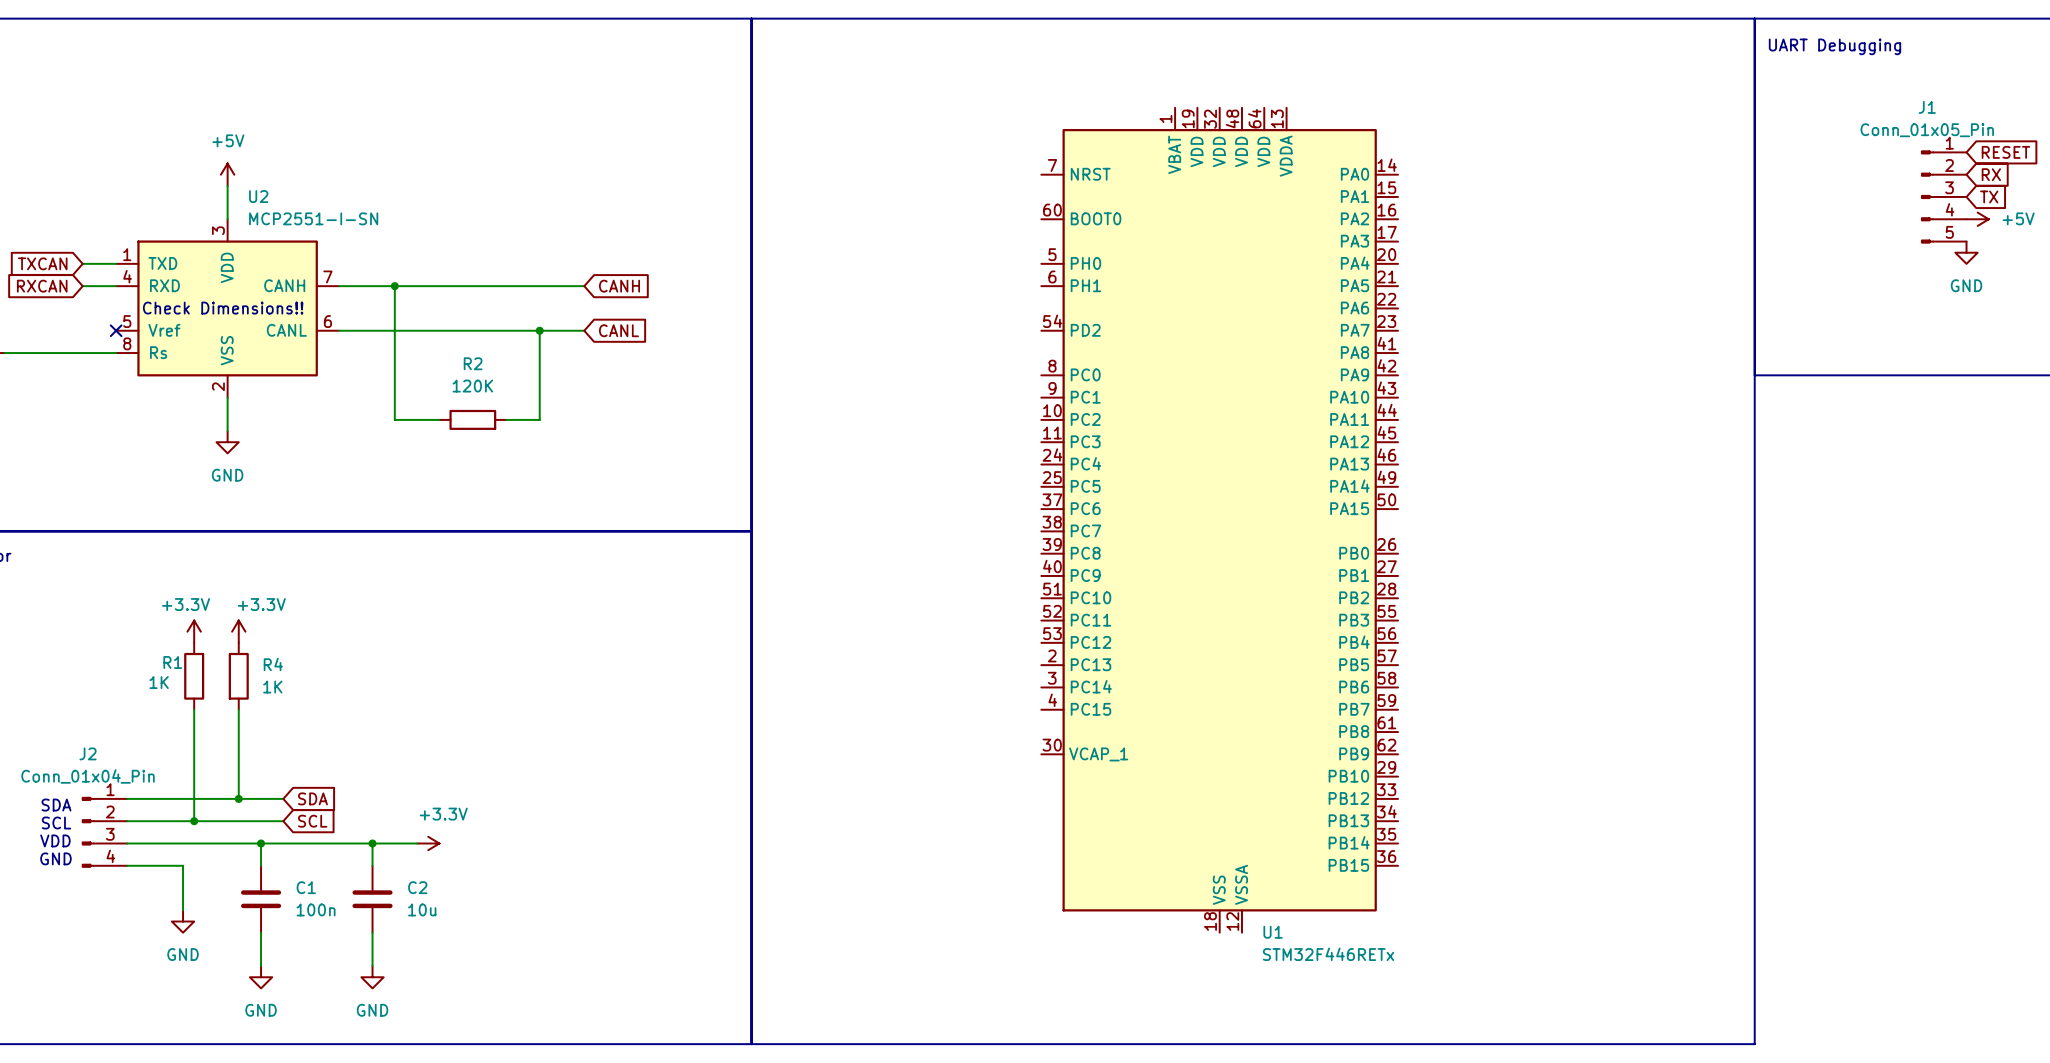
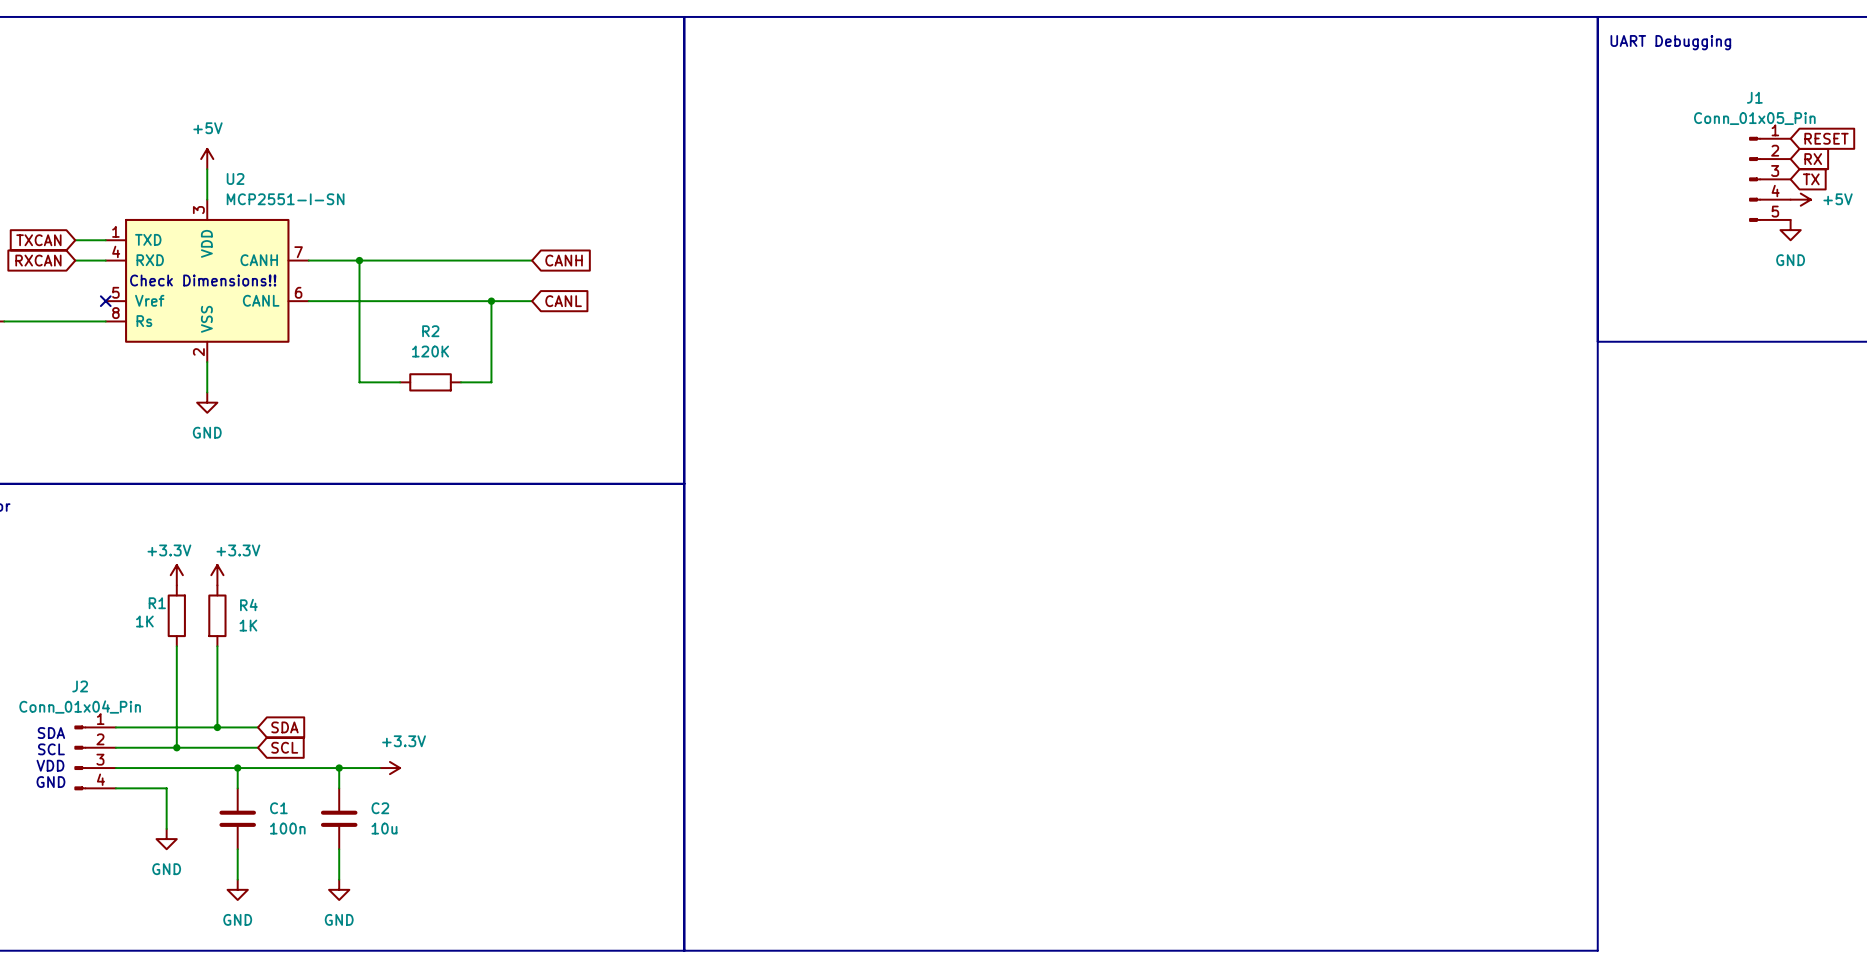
U1: STM32F446RETx (1219, 520) -> none

